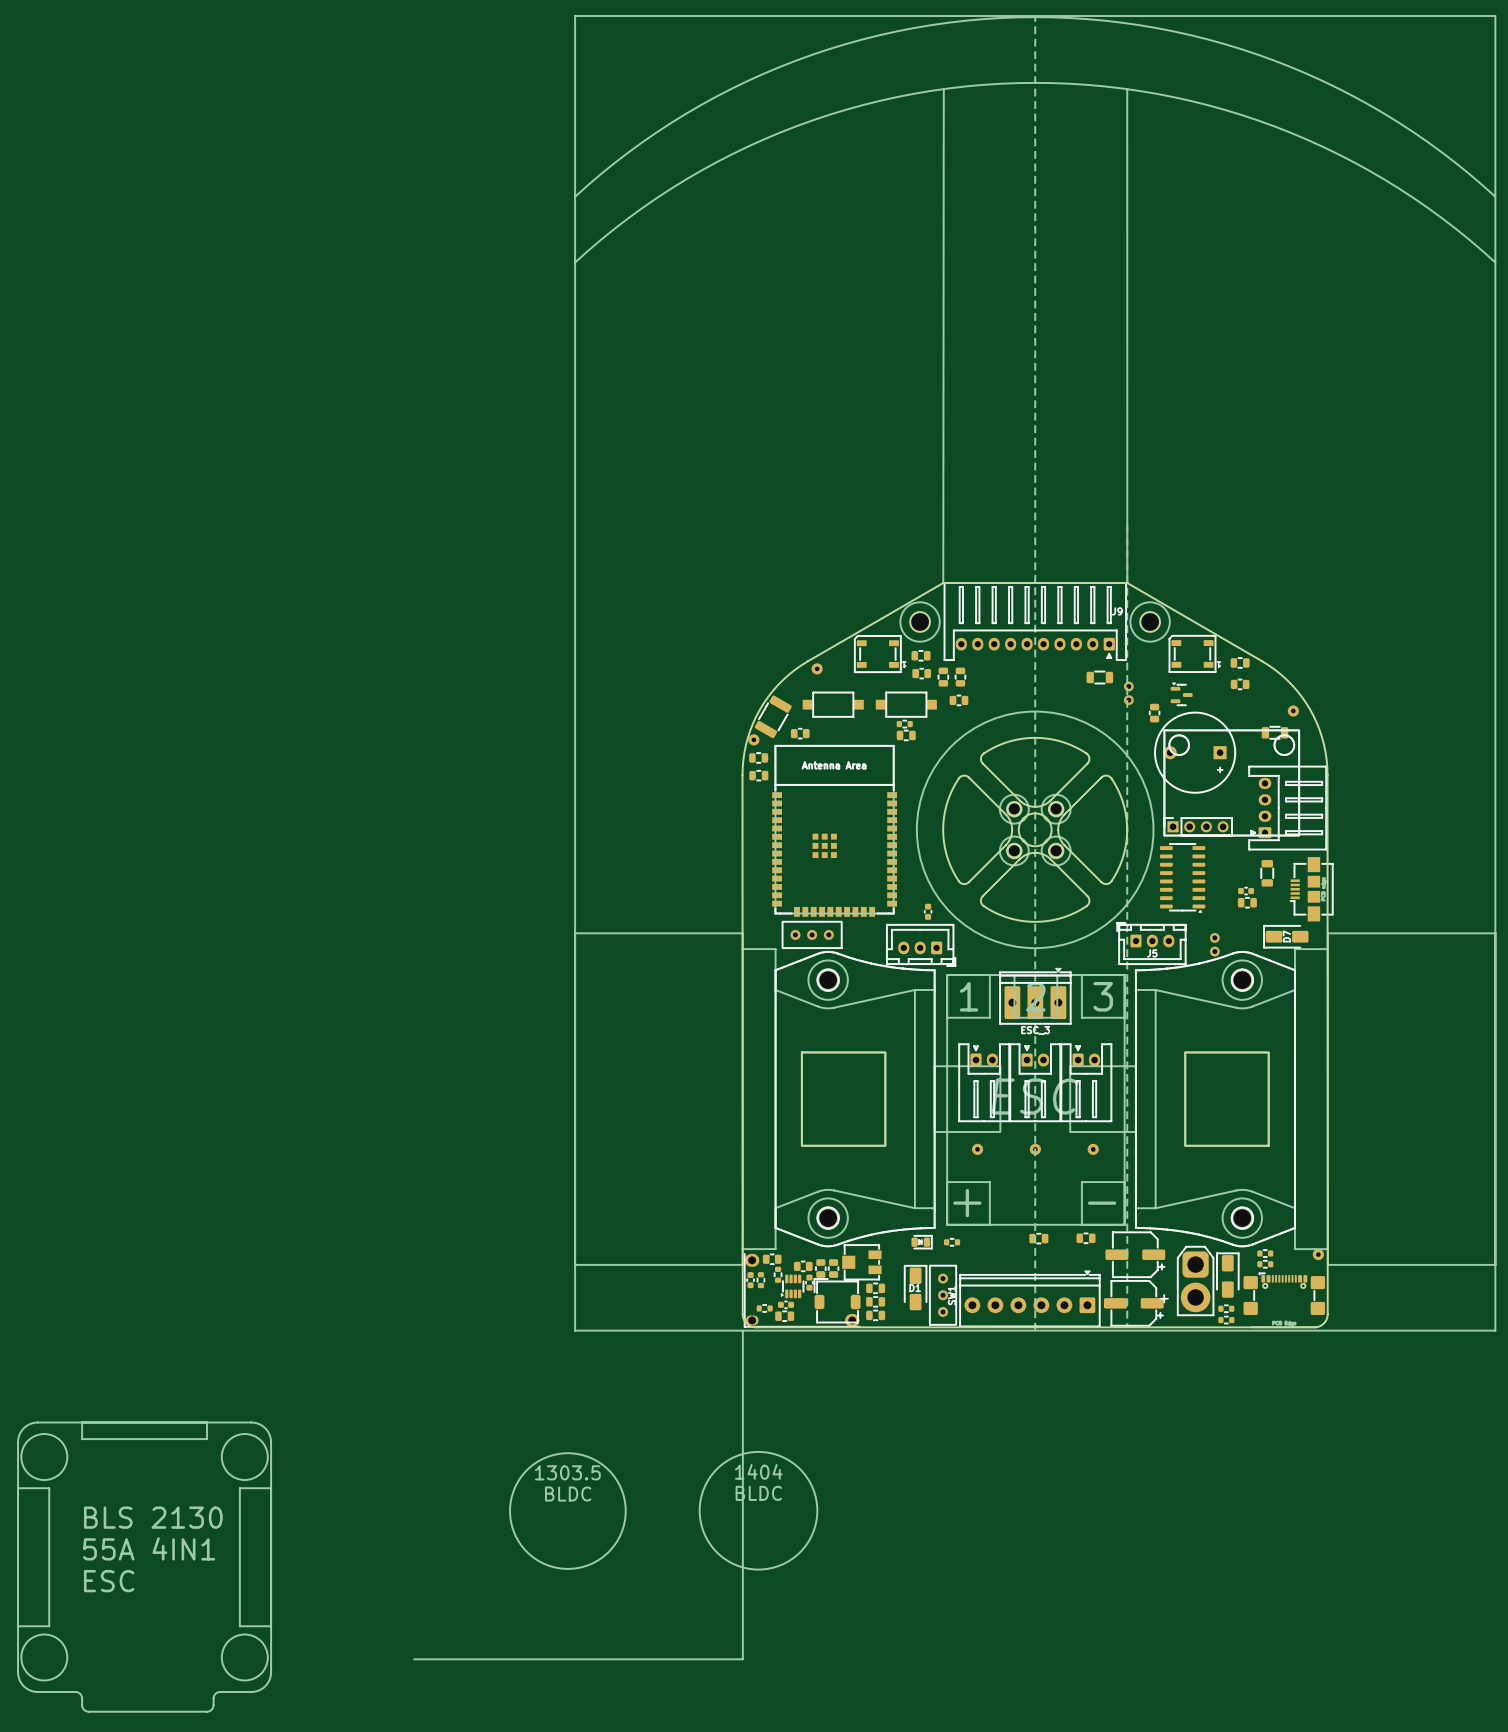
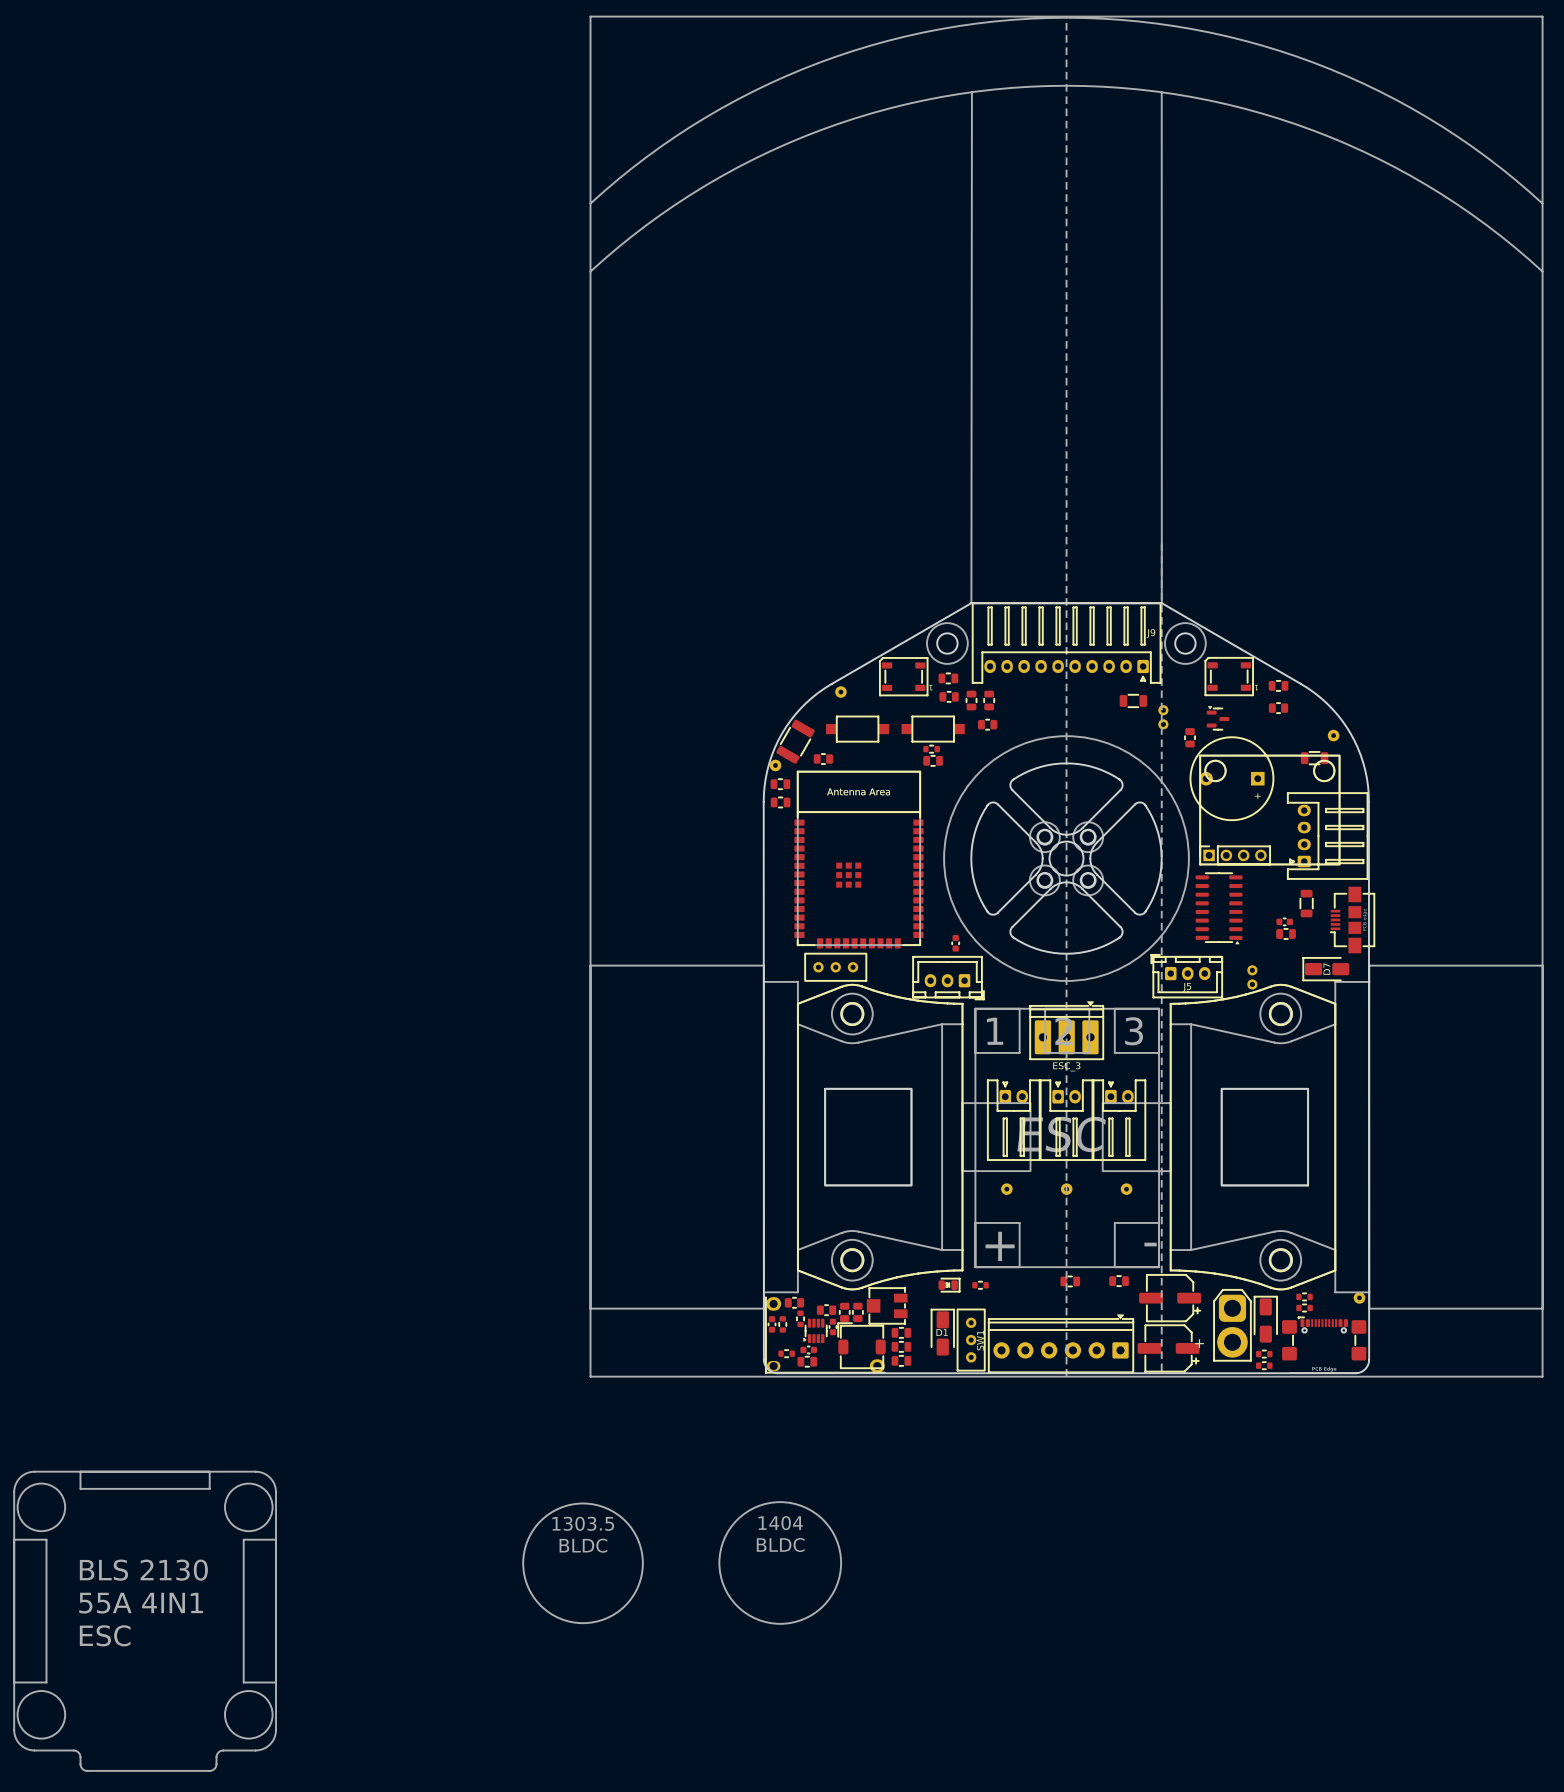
line: (742, 1330) (742, 1659) (414, 1659) -> none

